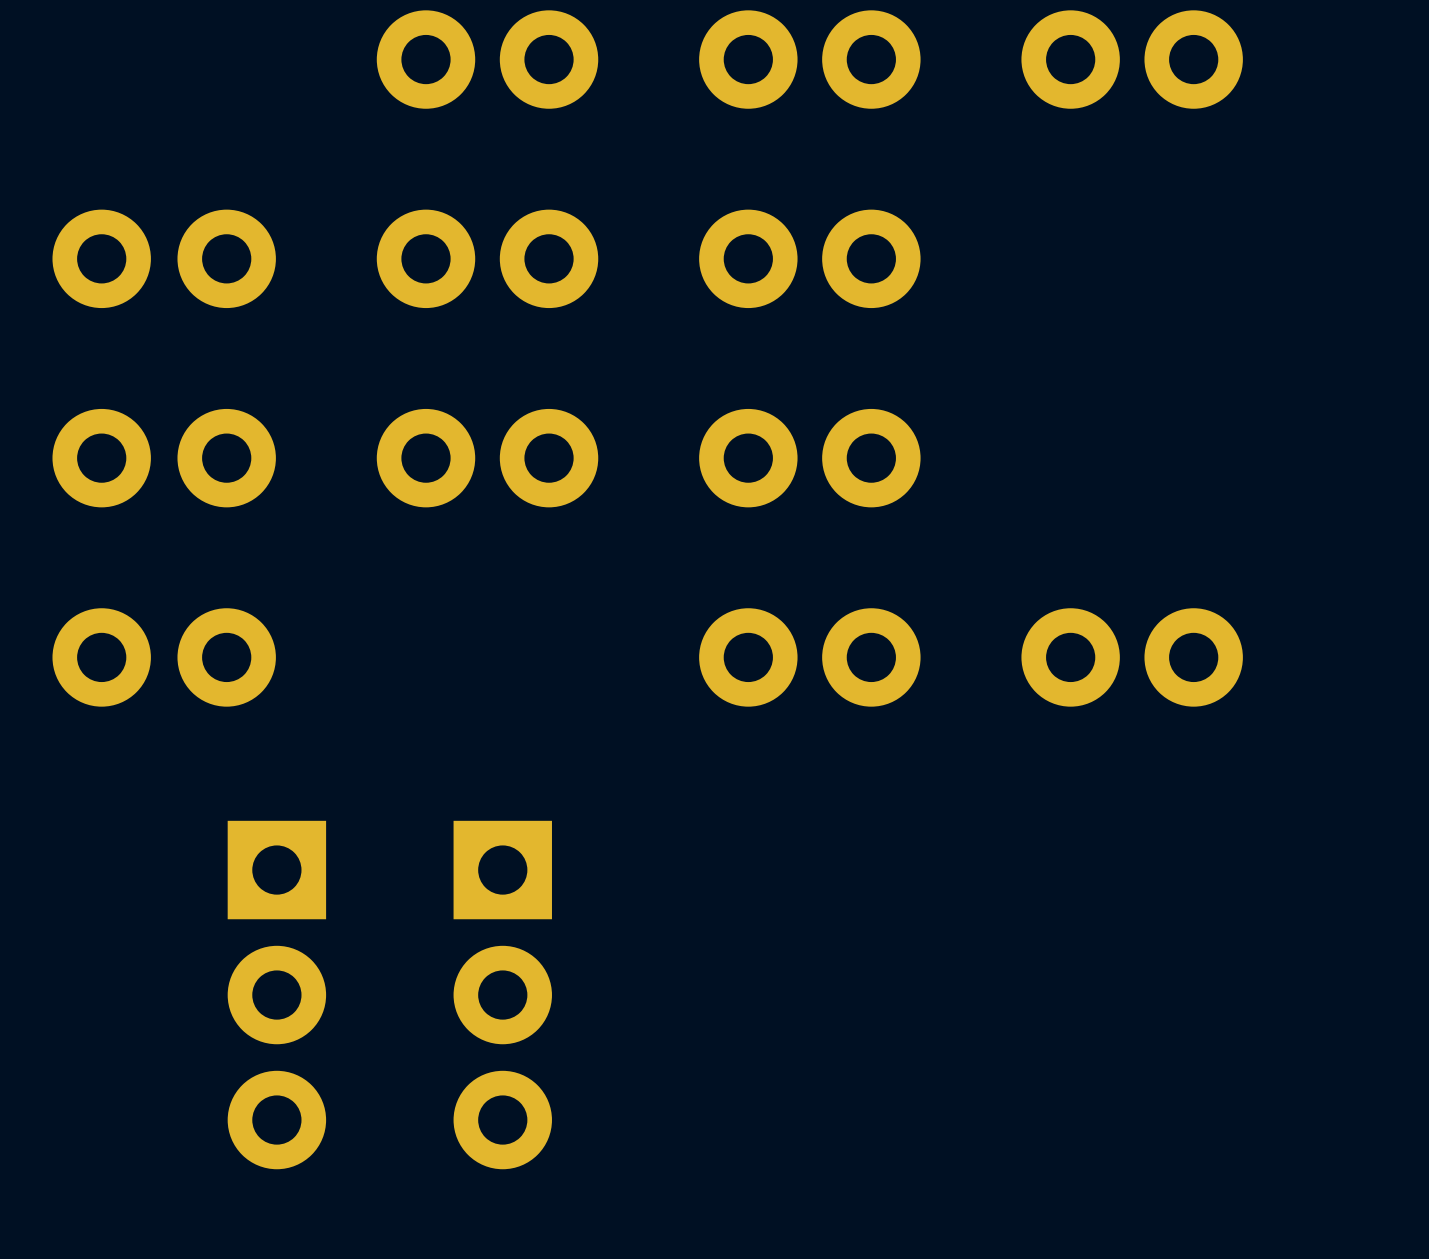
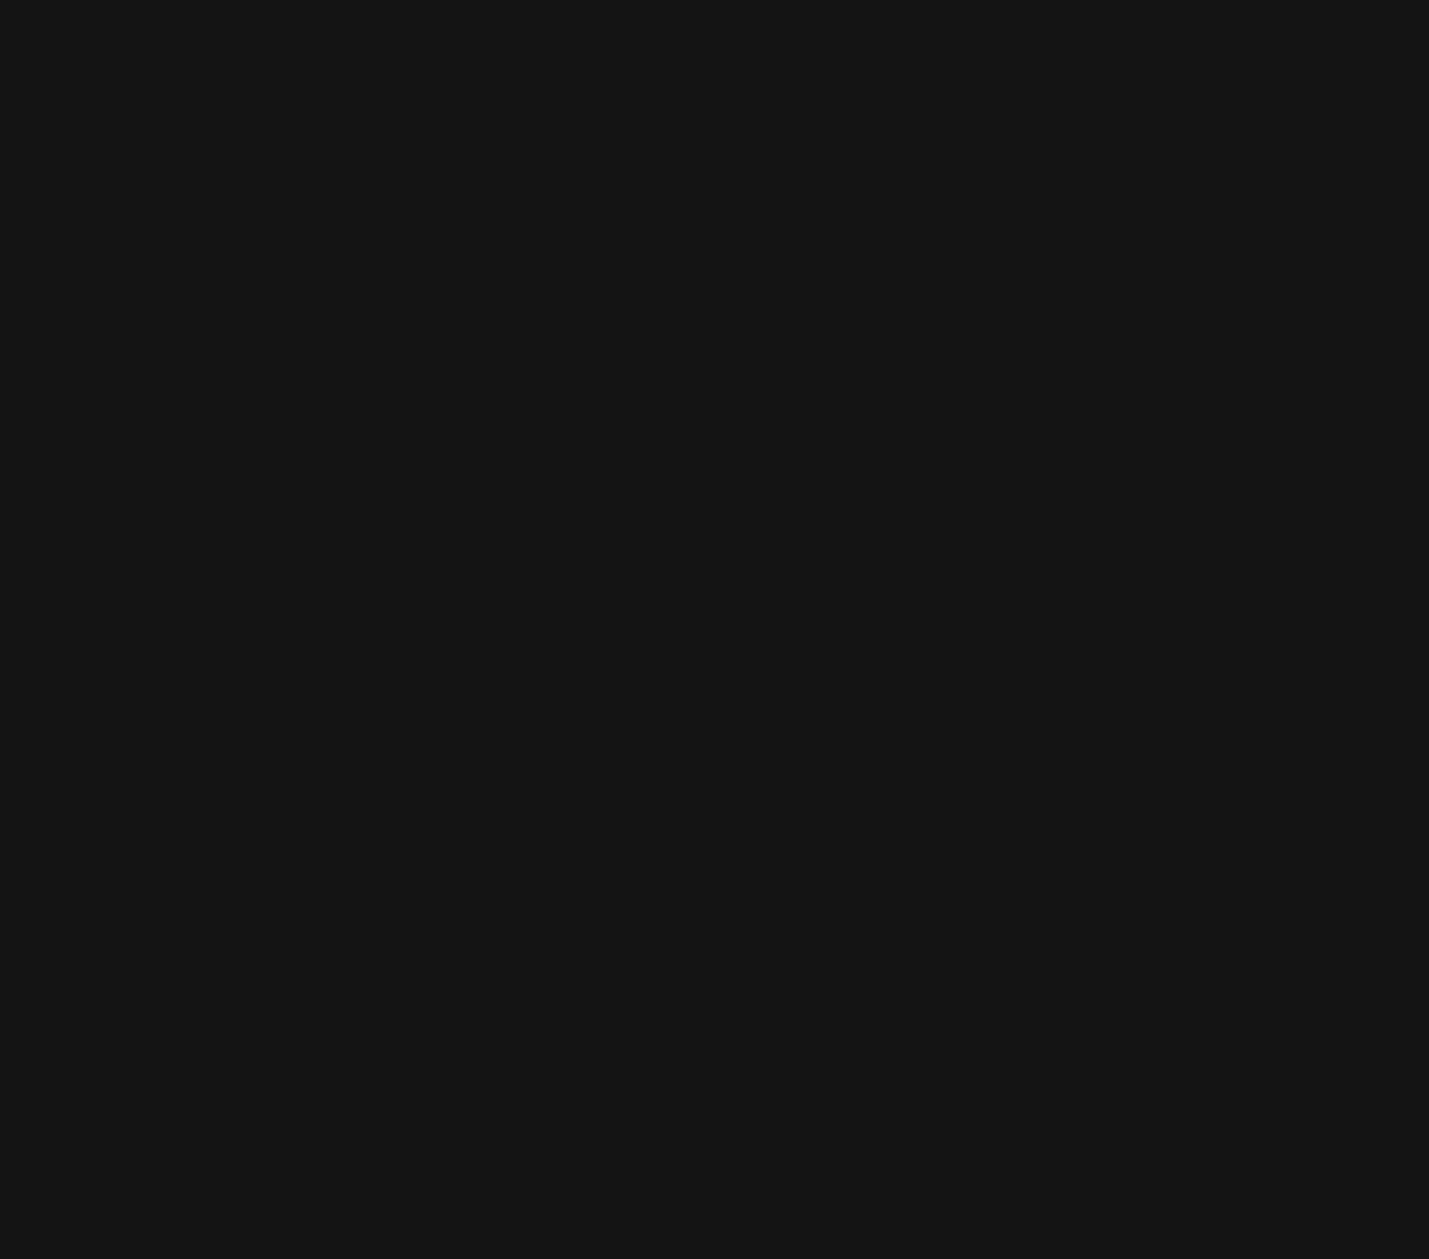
part: (487, 59) -> none
part: (809, 59) -> none
part: (1132, 59) -> none
part: (164, 258) -> none
part: (487, 258) -> none
part: (809, 258) -> none
part: (164, 458) -> none
part: (487, 458) -> none
part: (809, 458) -> none
part: (164, 657) -> none
part: (809, 657) -> none
part: (1132, 657) -> none
part: (276, 995) -> none
part: (502, 995) -> none

